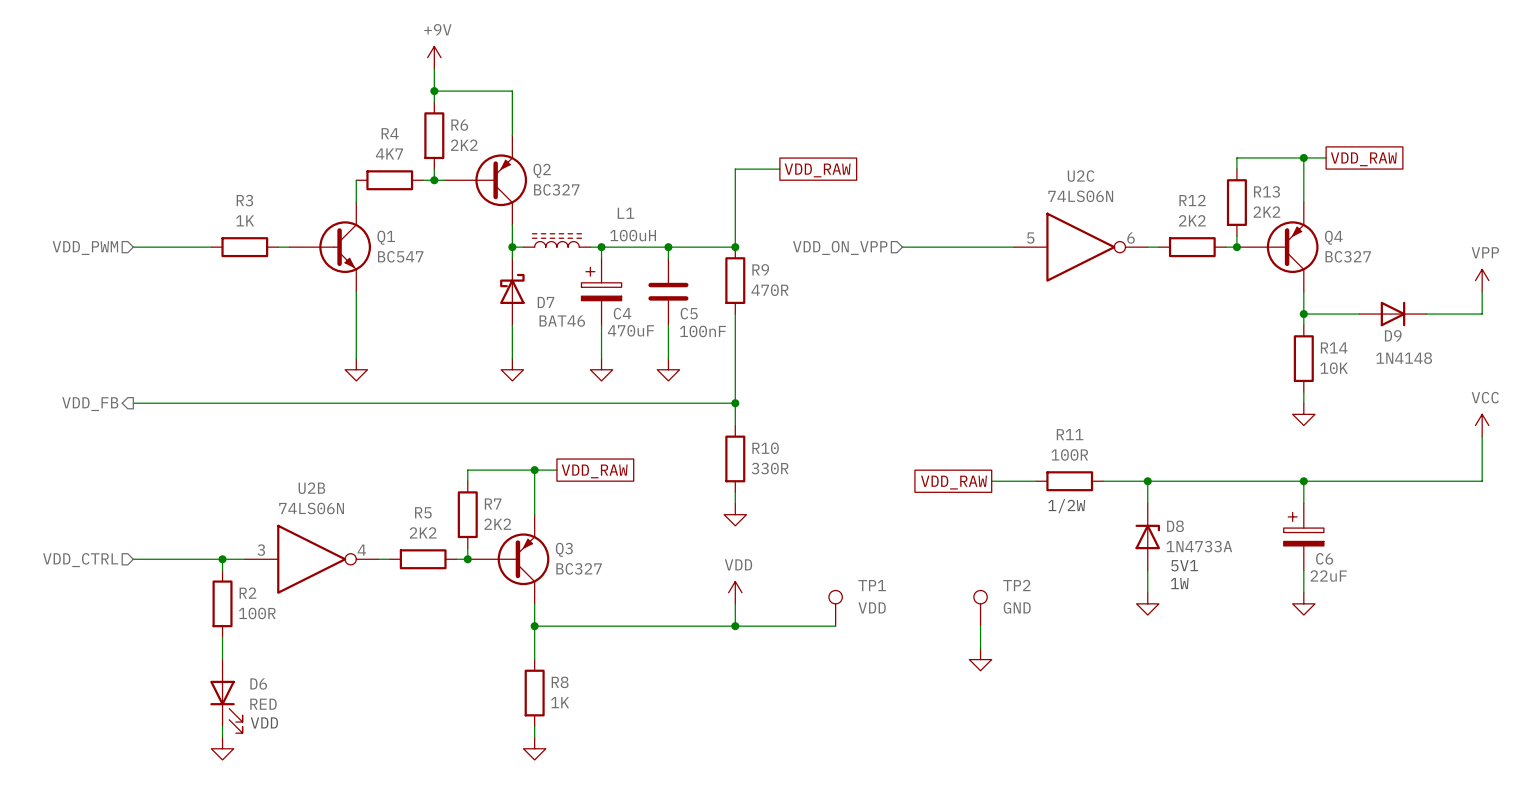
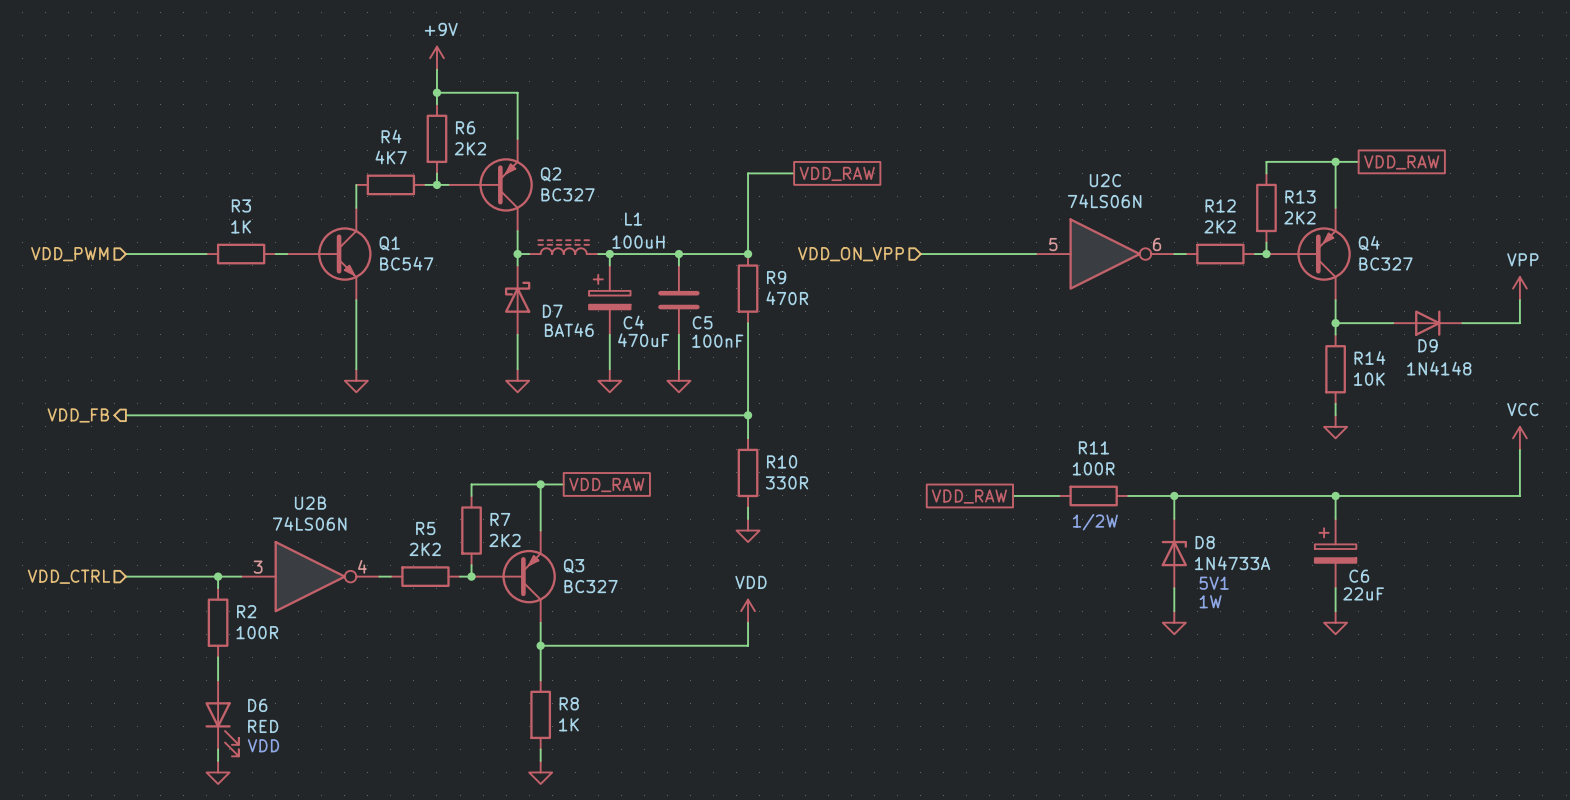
TP1: VDD (835, 608) -> none
TP2: GND (980, 608) -> none
wire: (735, 626) (835, 626) -> none
junction: (735, 626) -> none
wire: (980, 626) (980, 648) -> none
power symbol: (980, 659) -> none

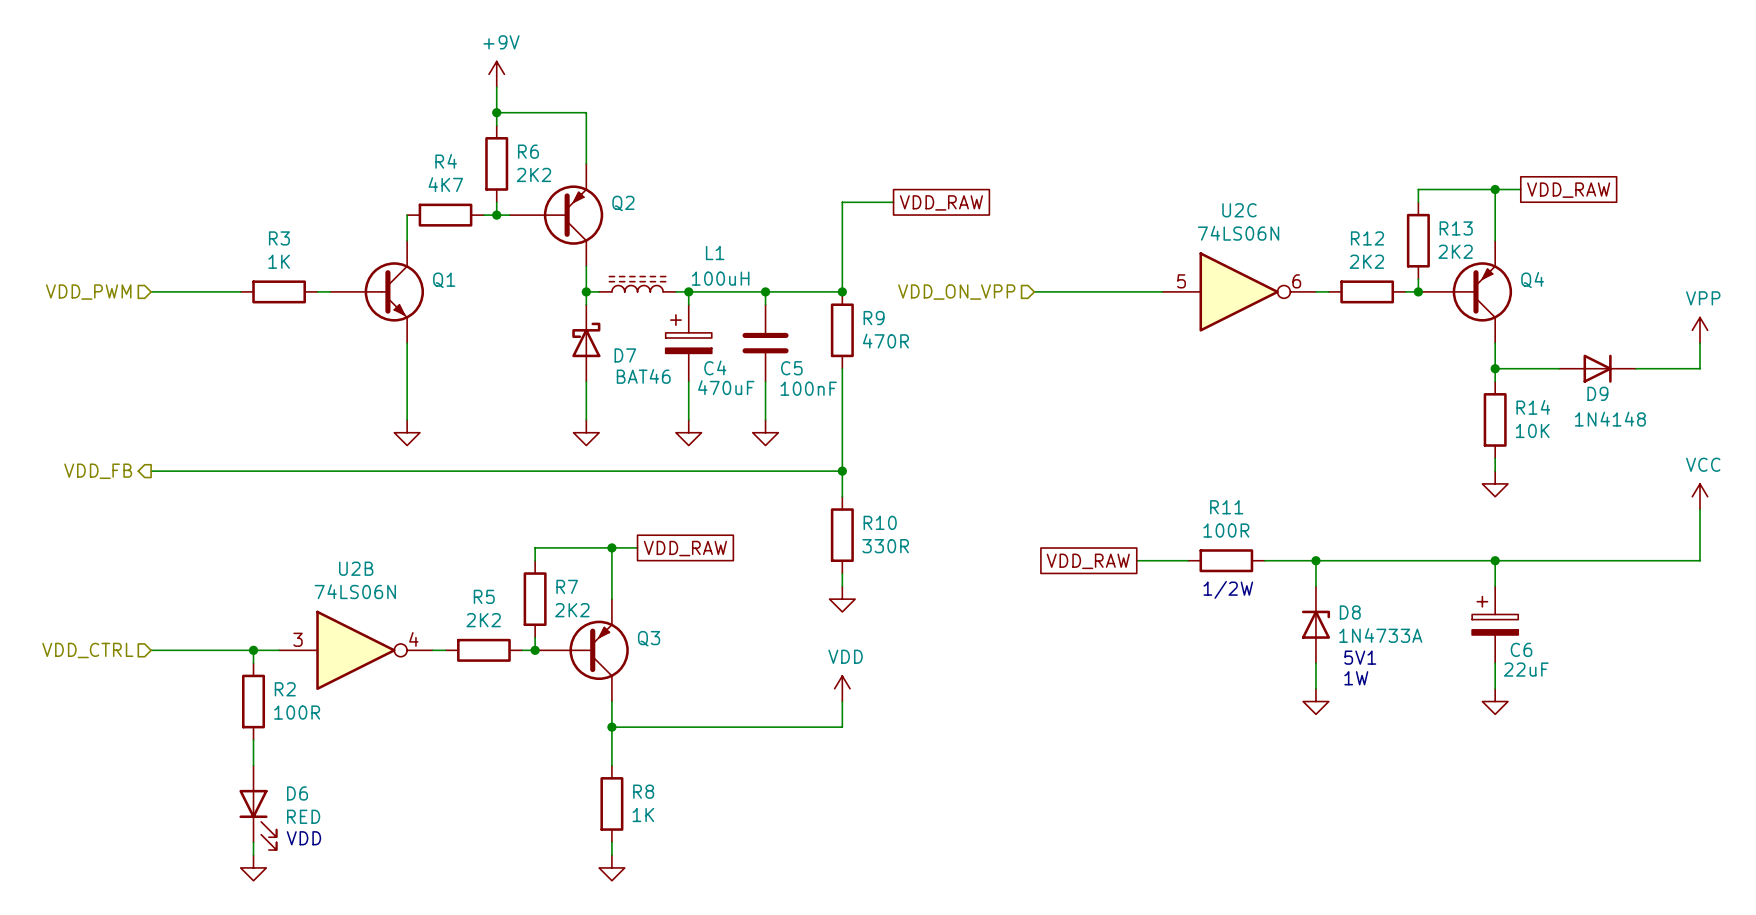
Q2 value: BC327 (568, 194) -> none
Q1 value: BC547 (406, 263) -> none
Q4 value: BC327 (1385, 263) -> none
Q3 value: BC327 (591, 586) -> none

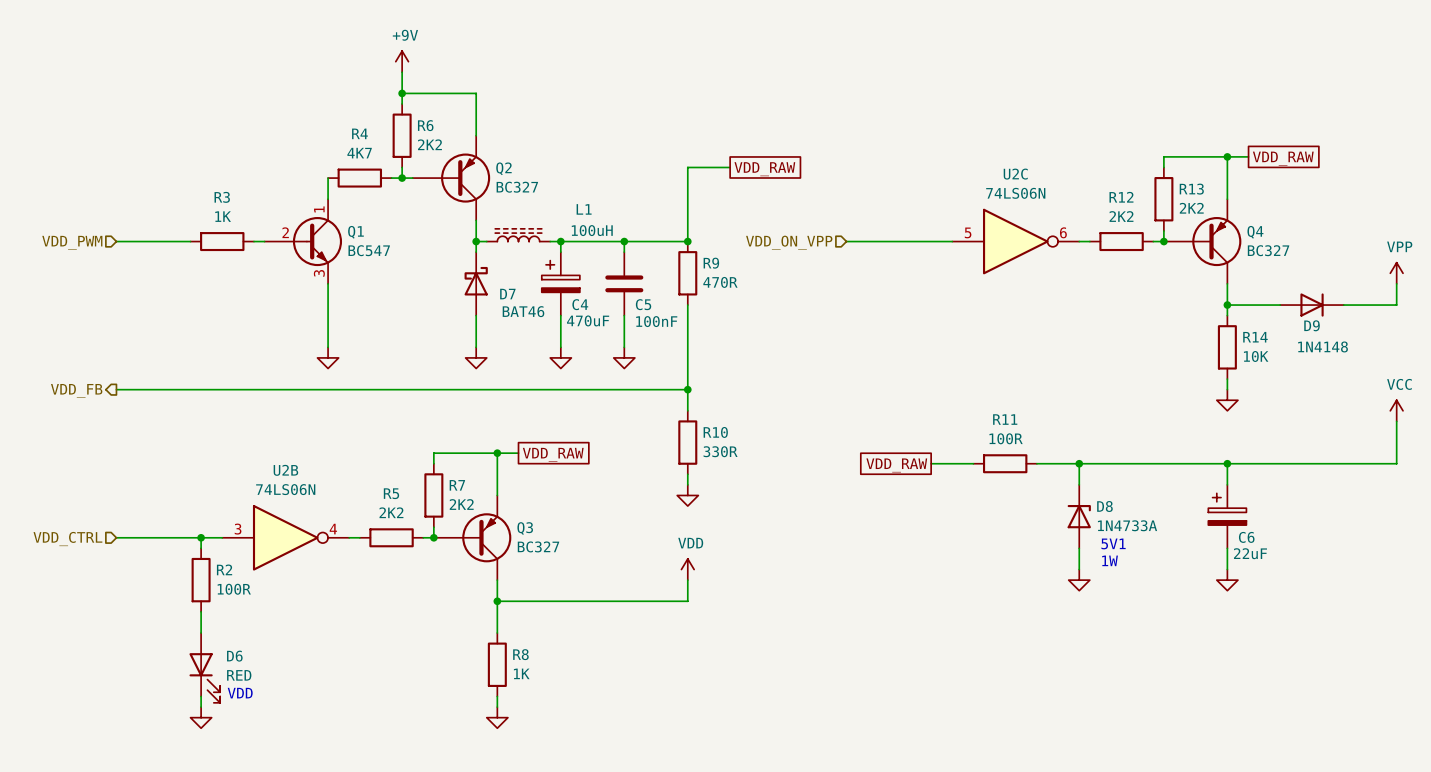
Q2 value: none -> BC327 (517, 187)
Q1 pin number: none -> 1 (319, 209)
Q1 pin number: none -> 2 (285, 232)
Q1 value: none -> BC547 (369, 250)
Q4 value: none -> BC327 (1268, 250)
Q1 pin number: none -> 3 (319, 273)
text: 1/2W (1228, 589) -> none
Q3 value: none -> BC327 (538, 546)

